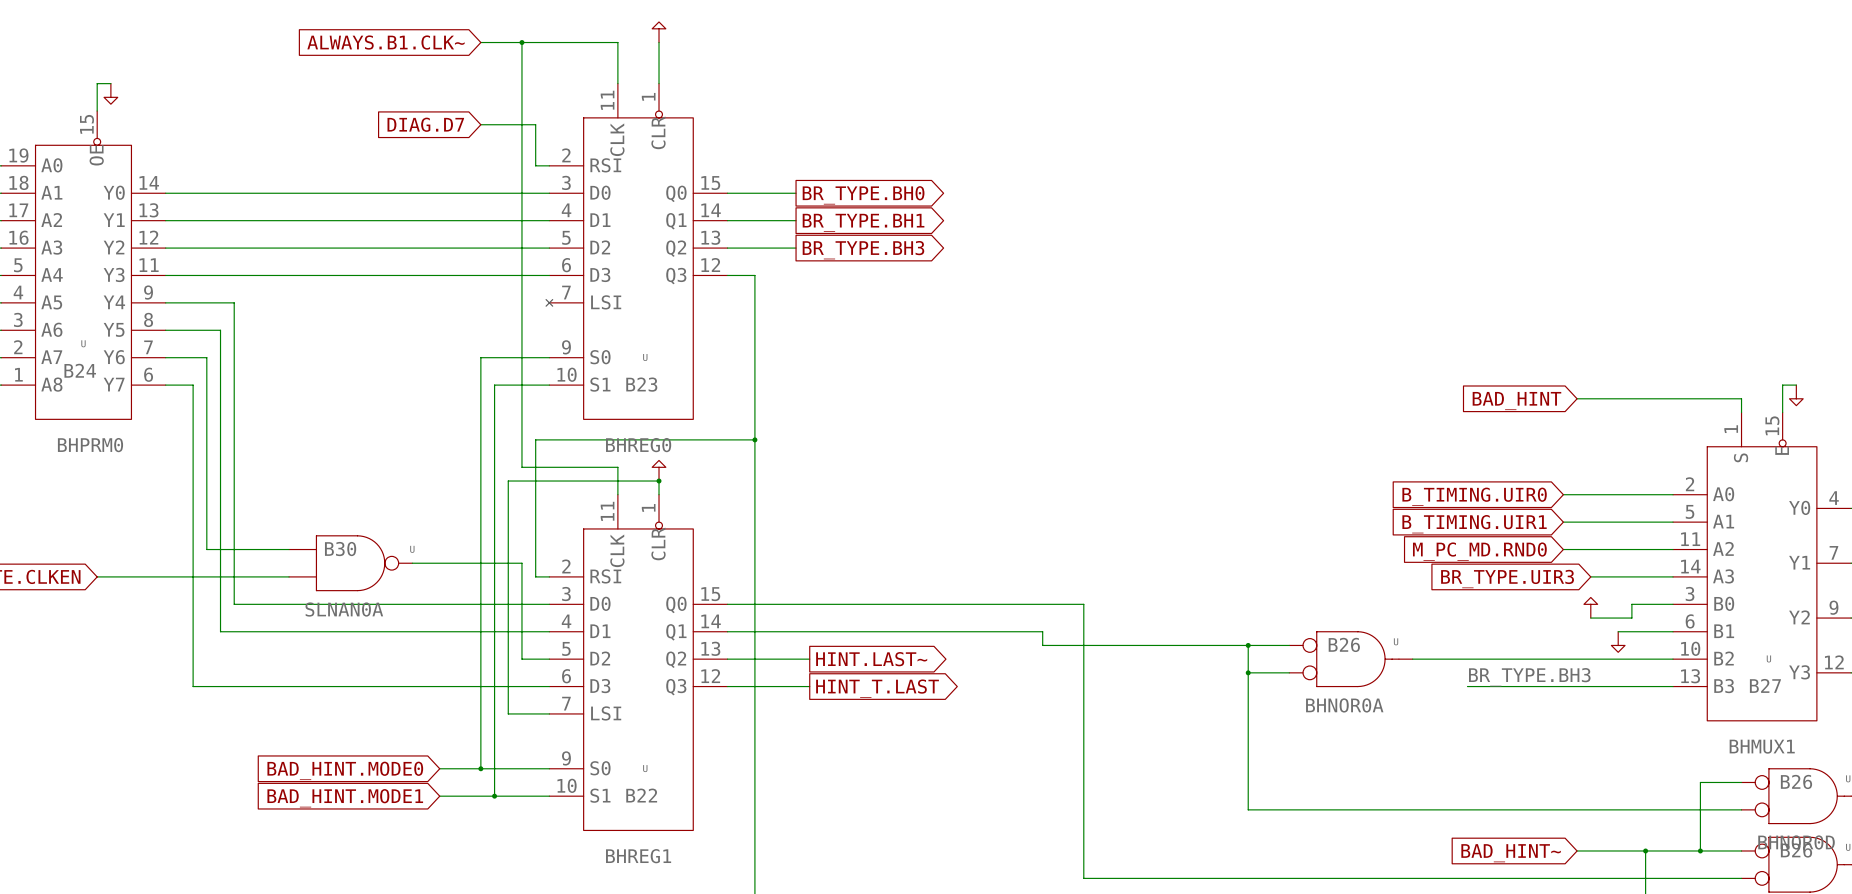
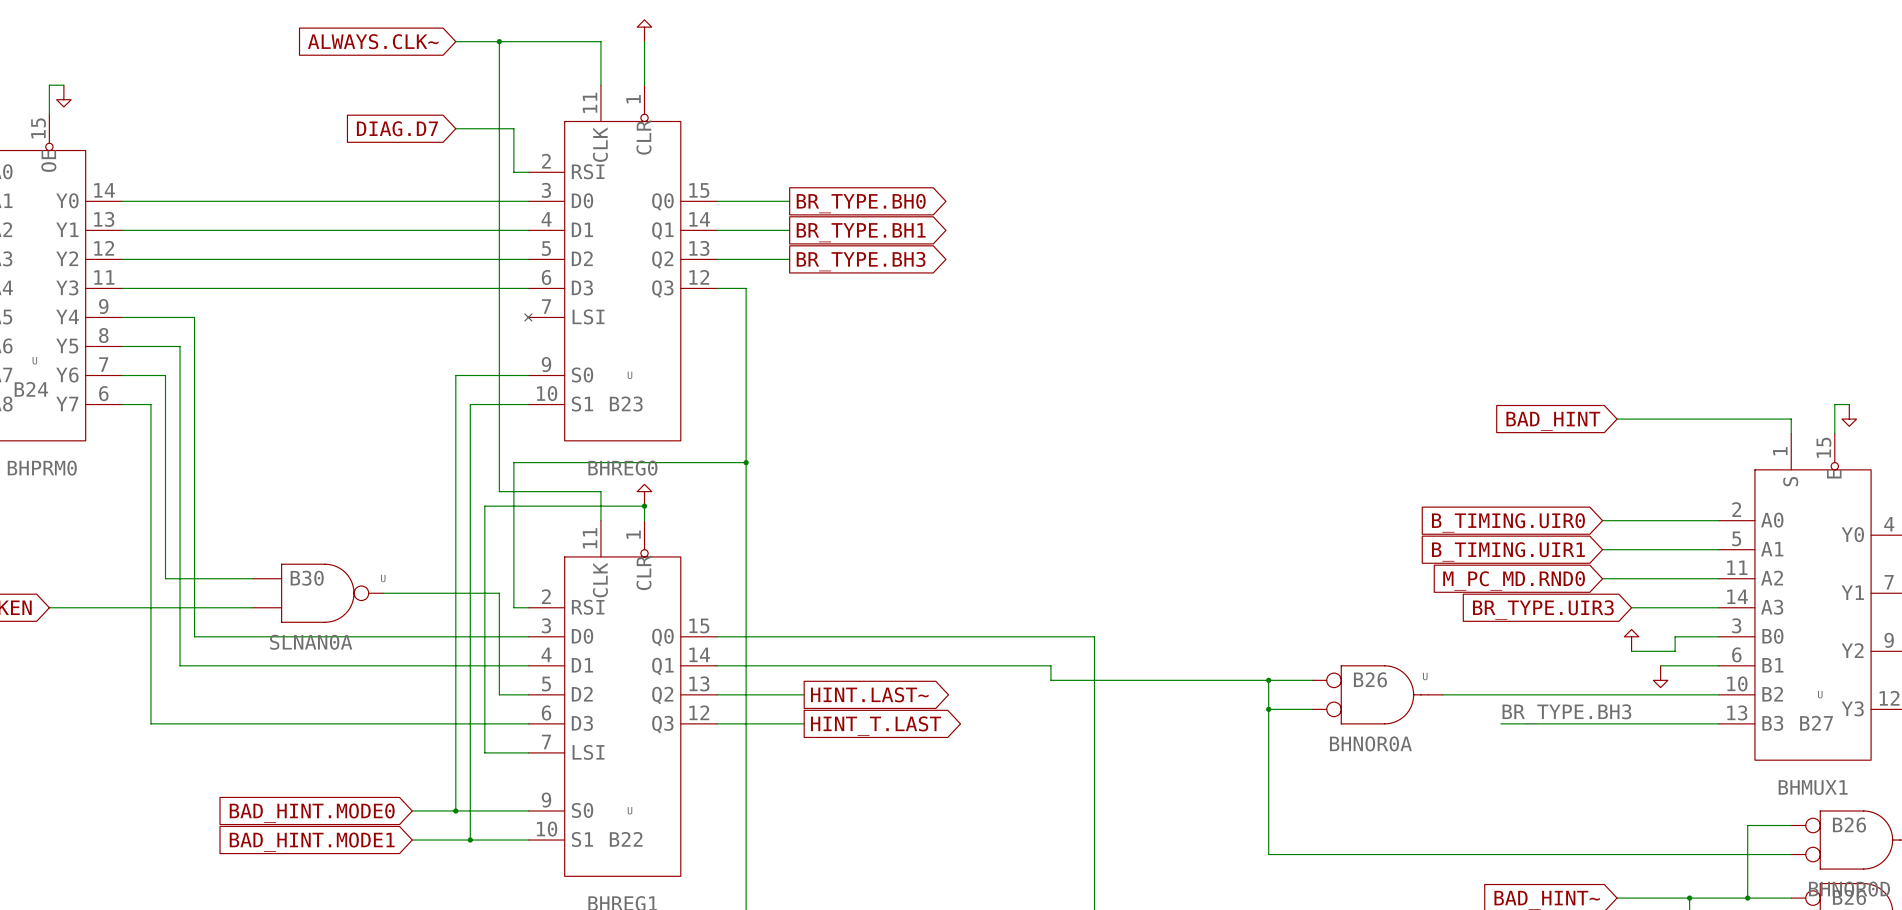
global label: ALWAYS.B1.CLK~ (386, 42) -> ALWAYS.CLK~ (373, 41)

